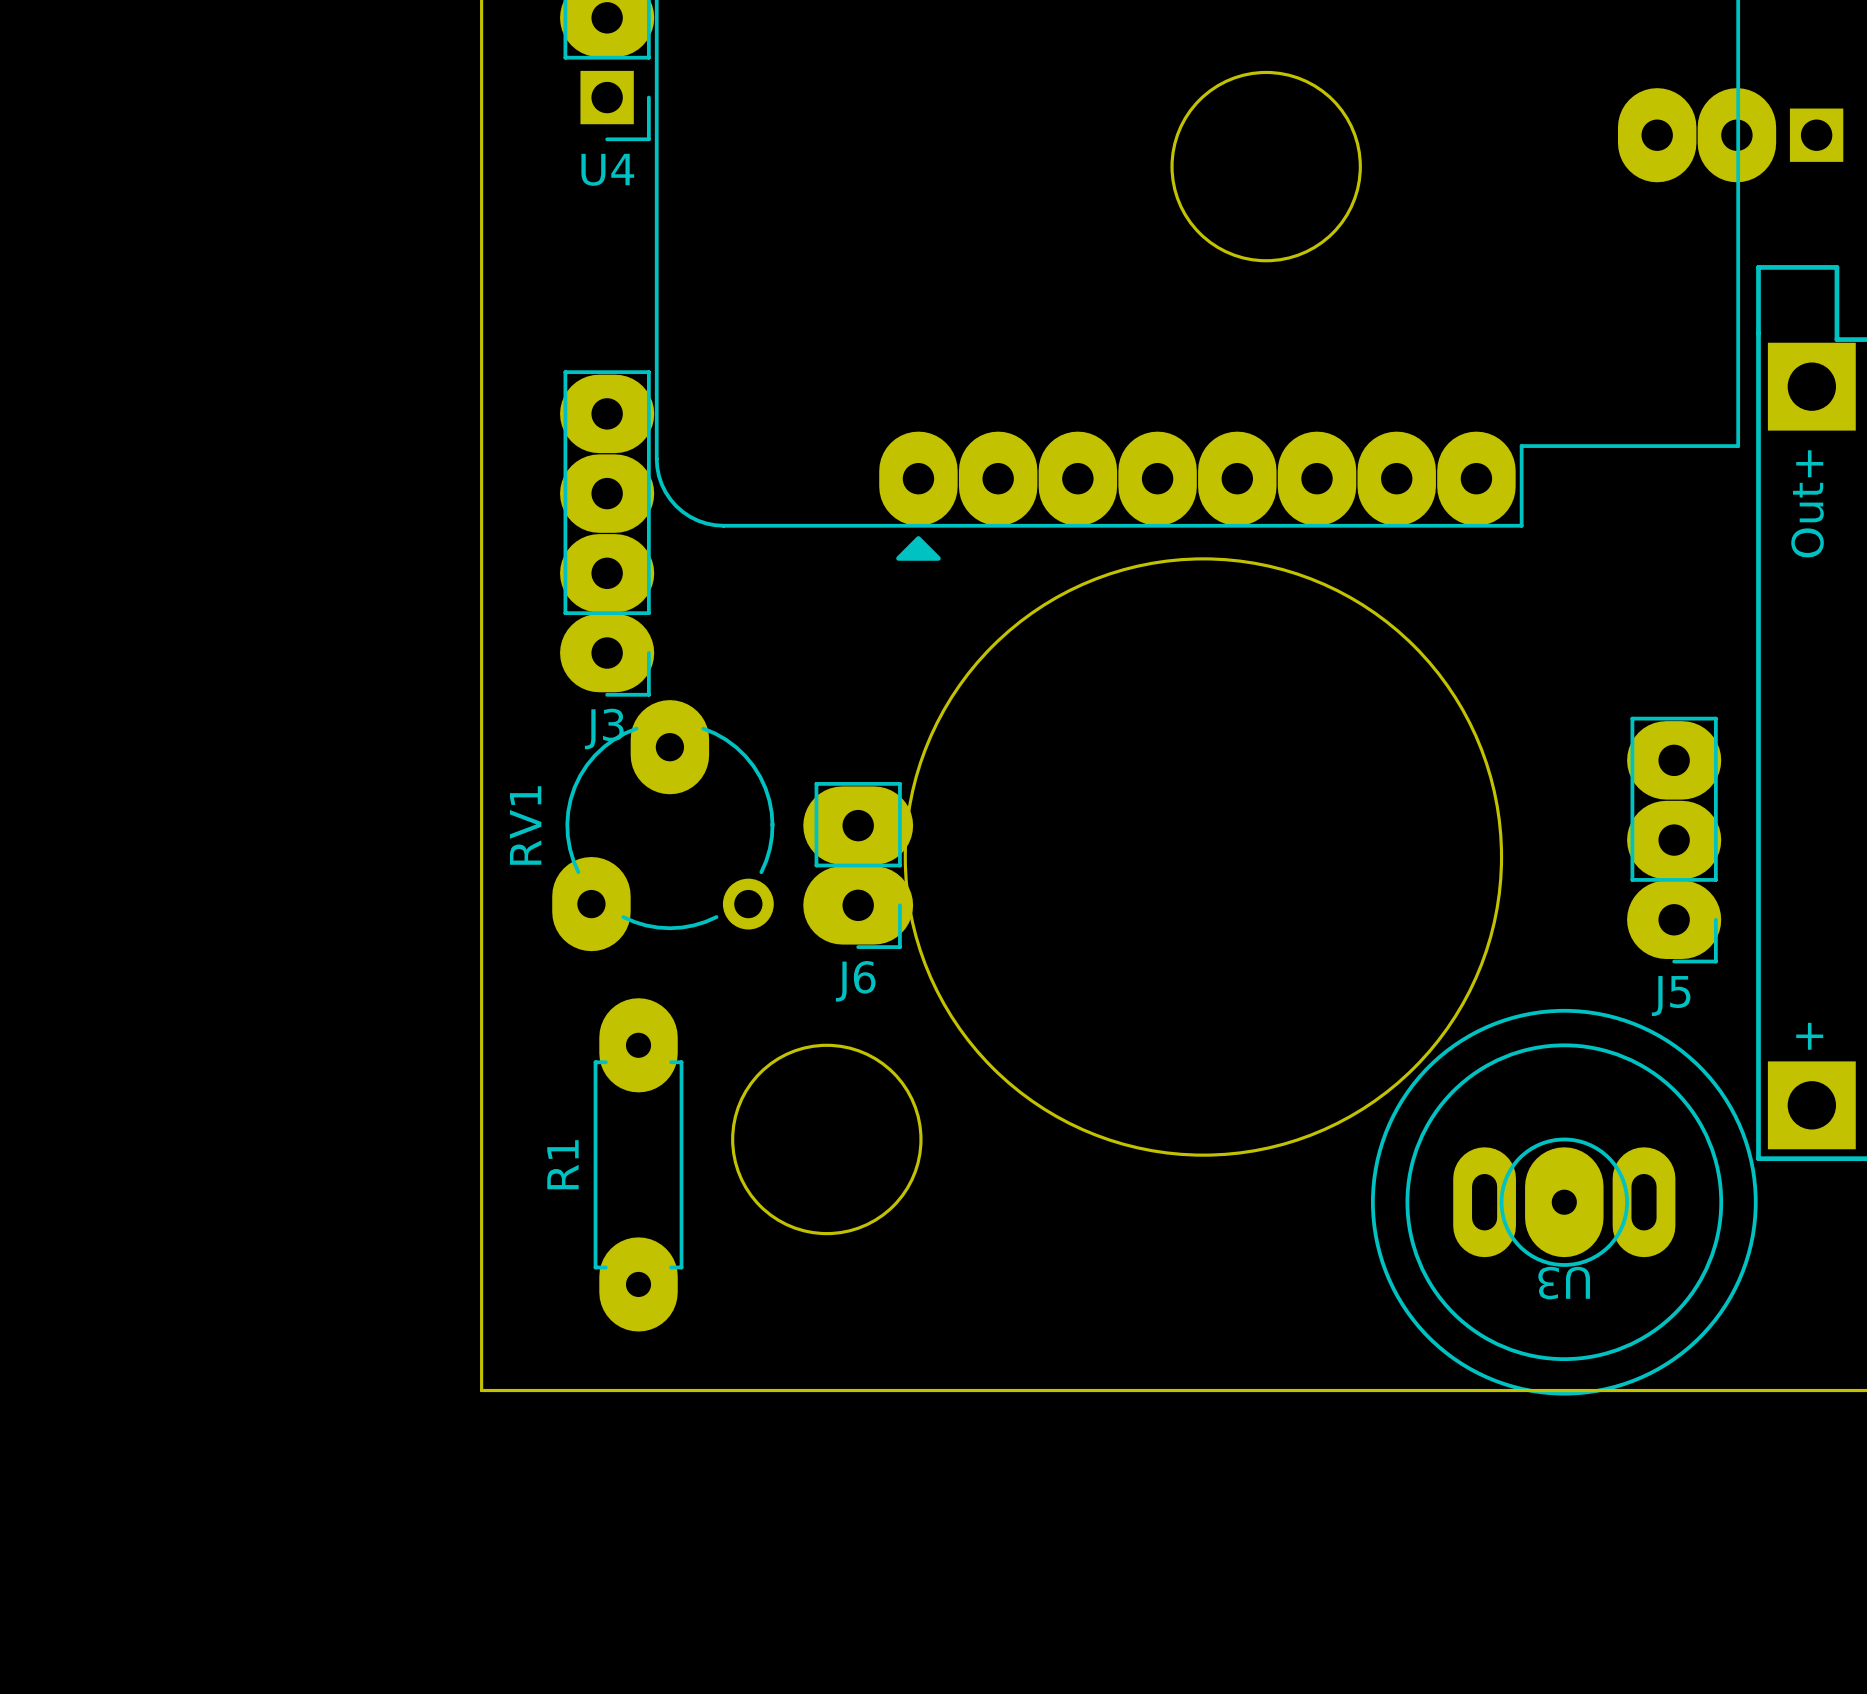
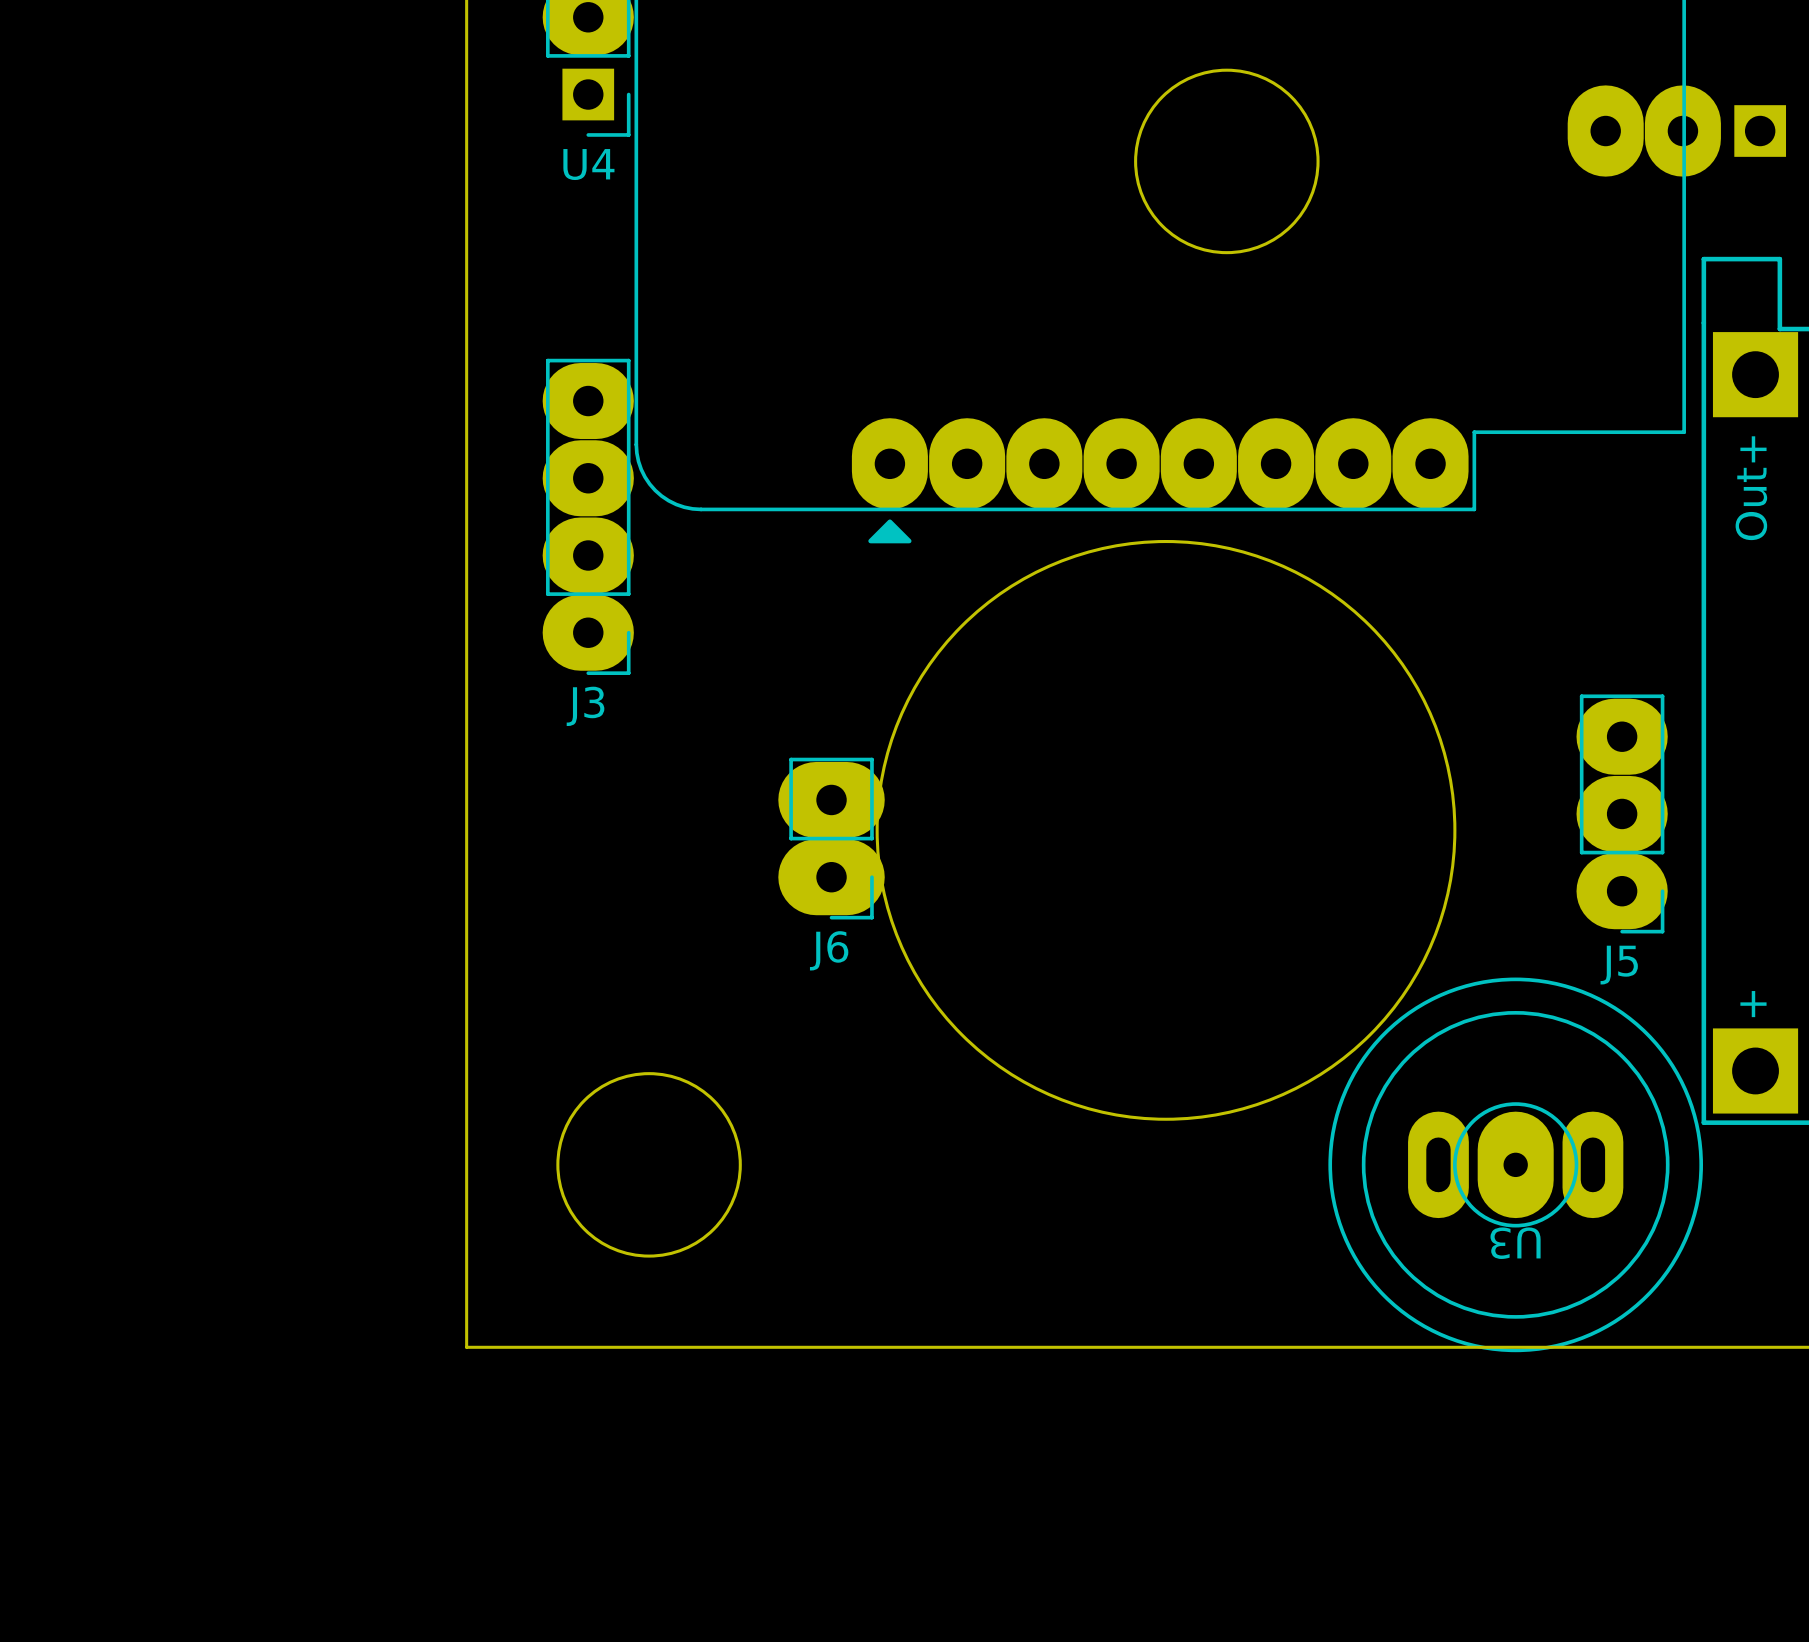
RV1: (663, 825) -> none
round board edge position: (826, 1139) -> (649, 1164)
R1: (638, 1164) -> none

